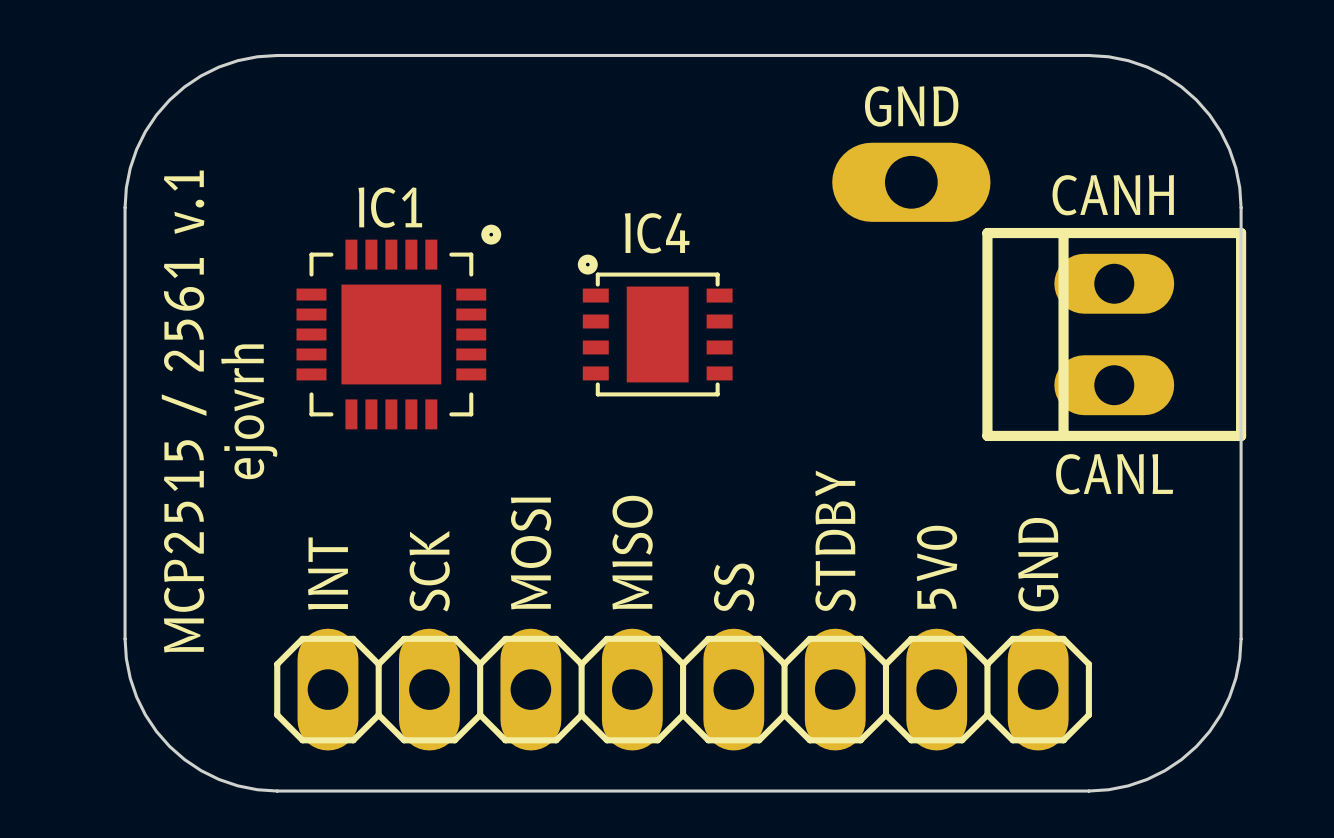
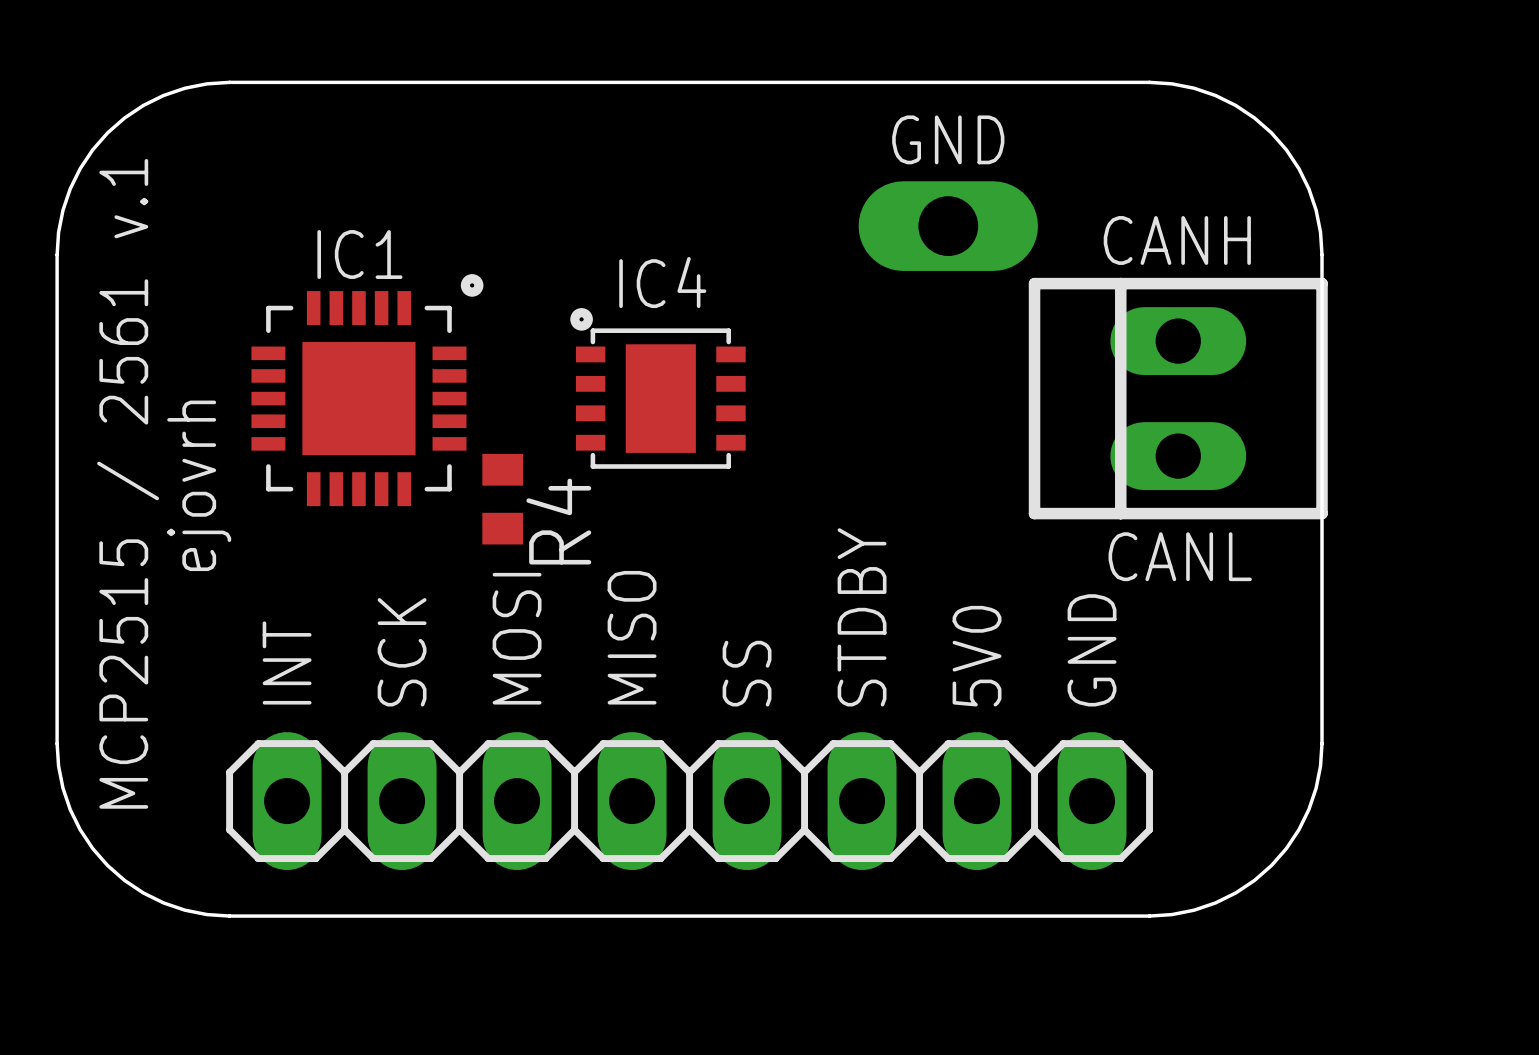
R4: none -> (502, 499)

